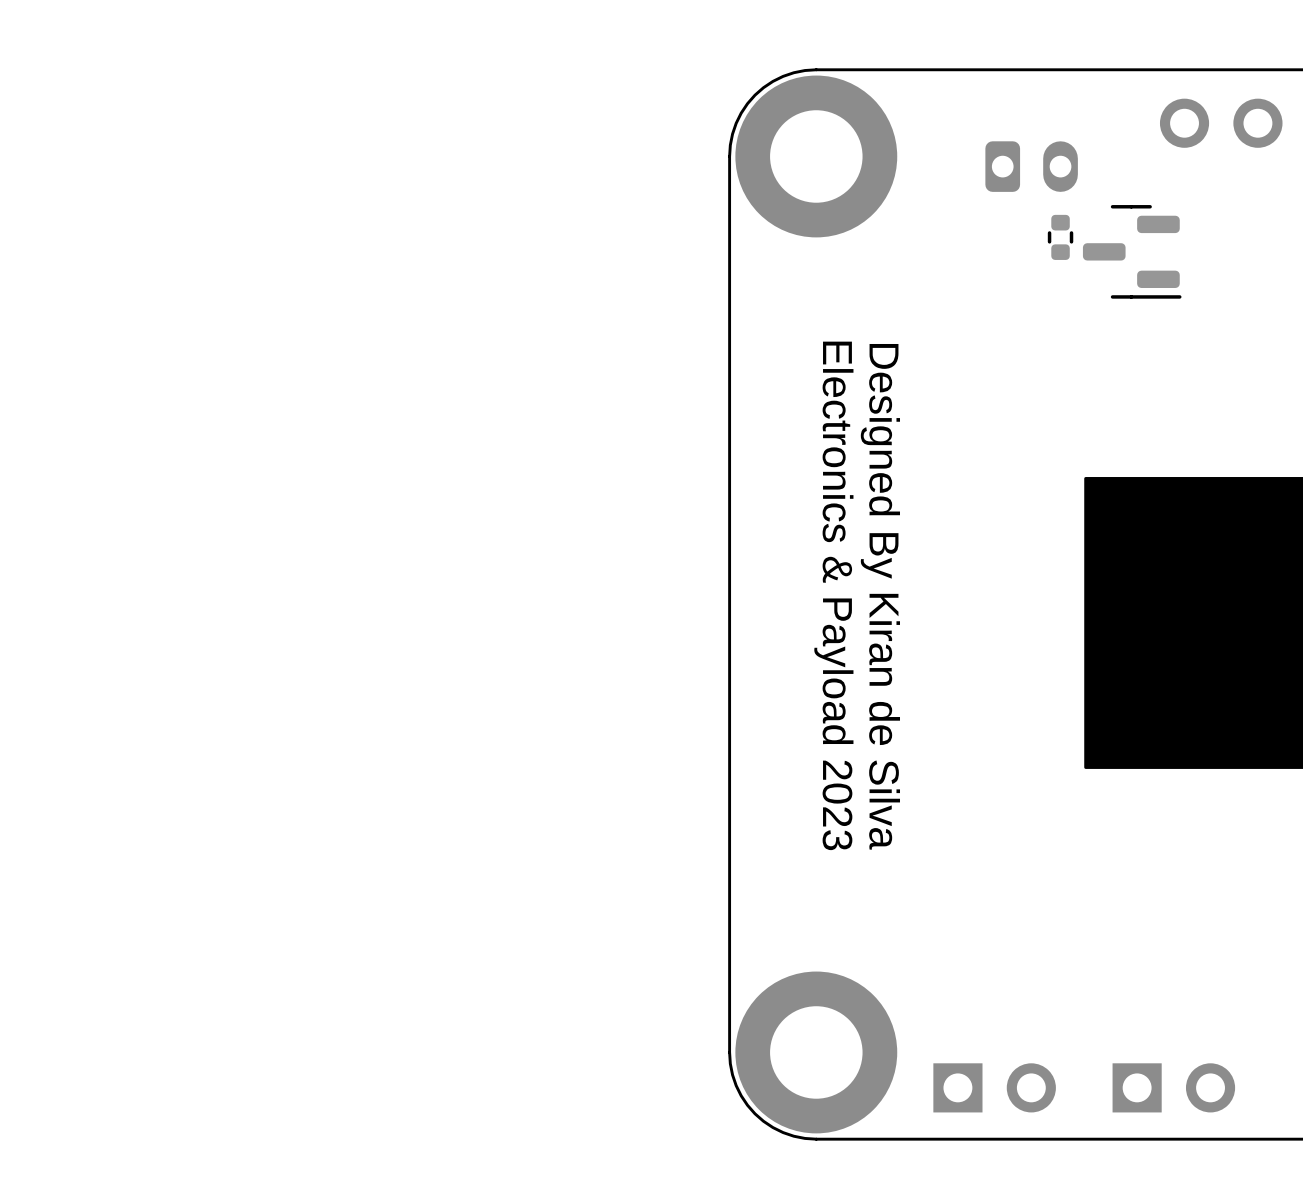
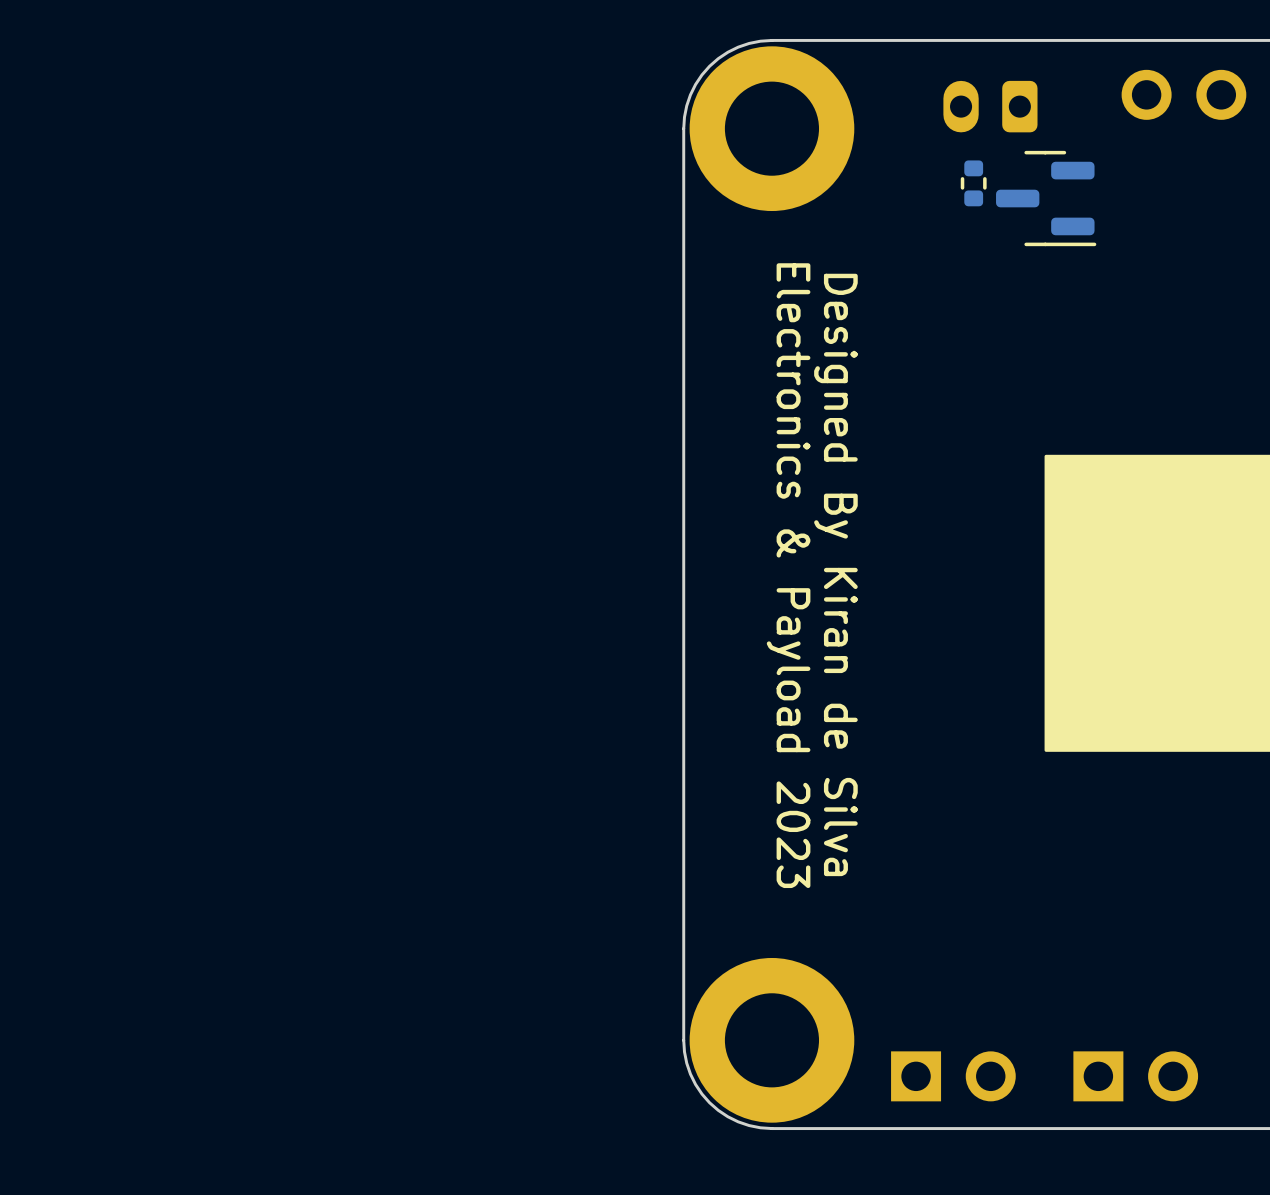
part rotation: 0° (1031, 166) -> 180° (990, 106)
part position: (1060, 237) -> (973, 183)
part position: (1132, 251) -> (1046, 198)

